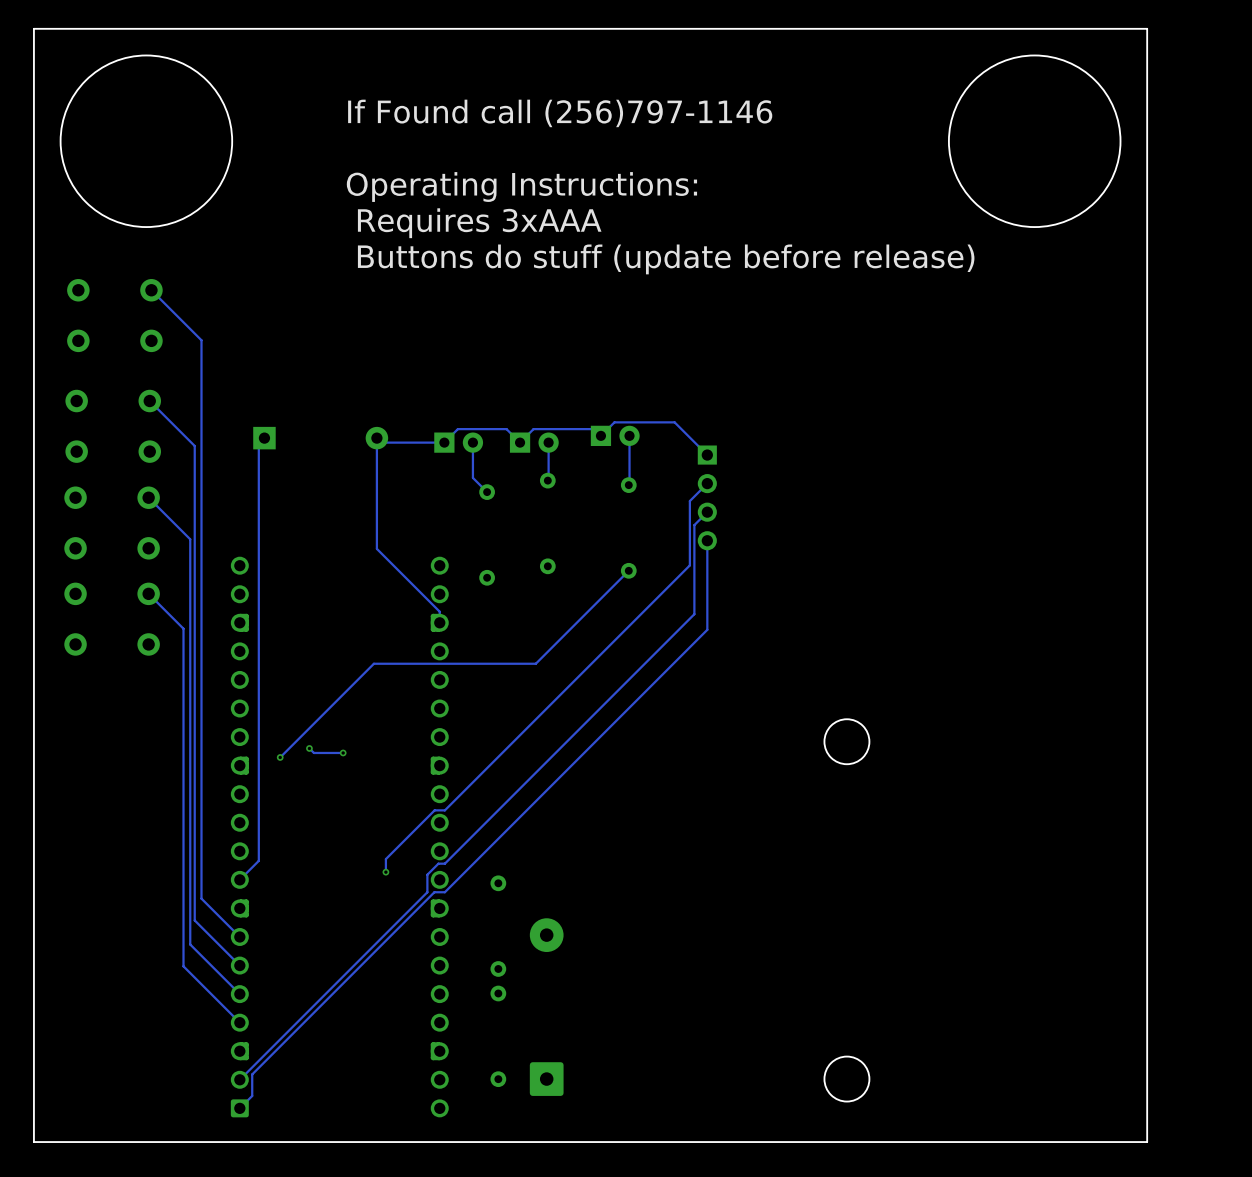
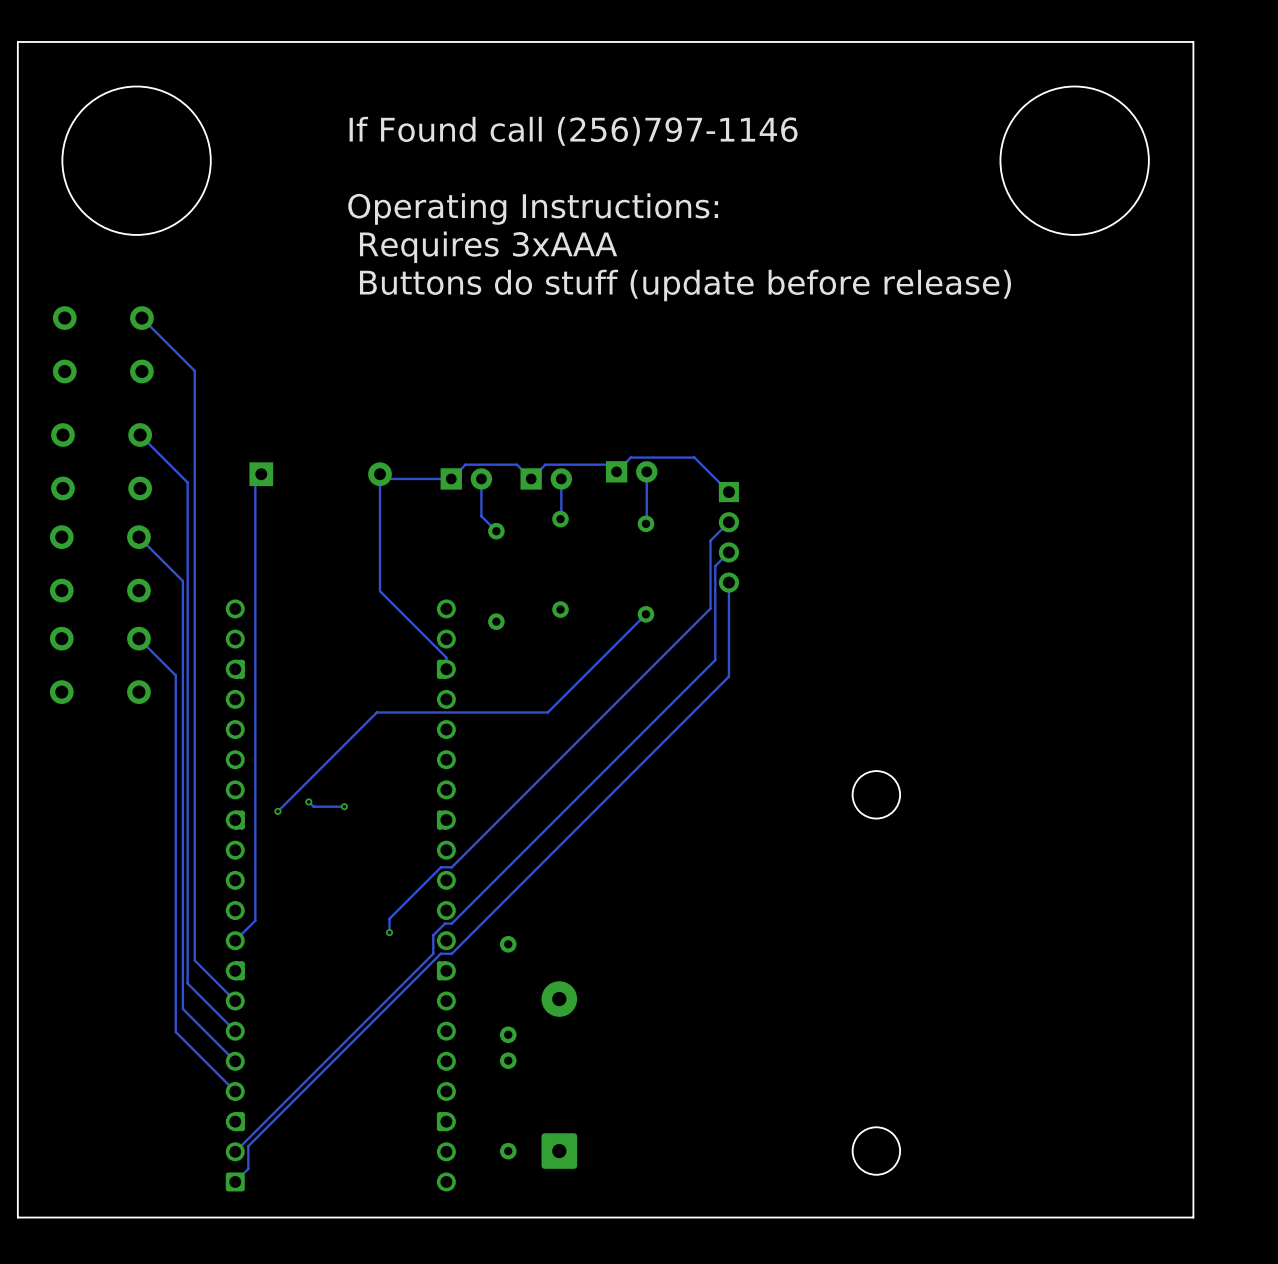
round board edge size: [60, 55, 233, 228] -> [62, 86, 212, 236]
round board edge size: [948, 55, 1121, 228] -> [1000, 86, 1150, 236]

